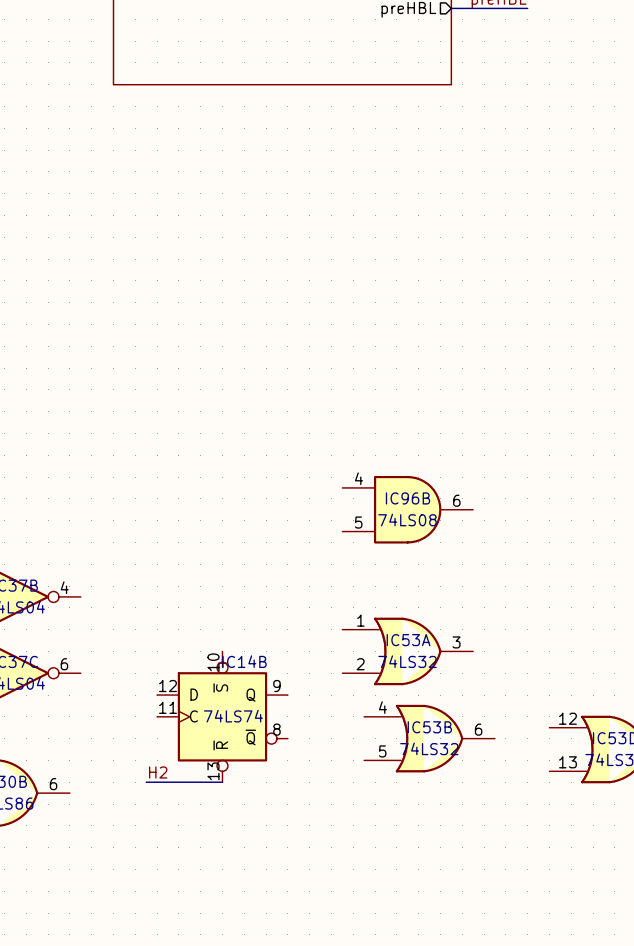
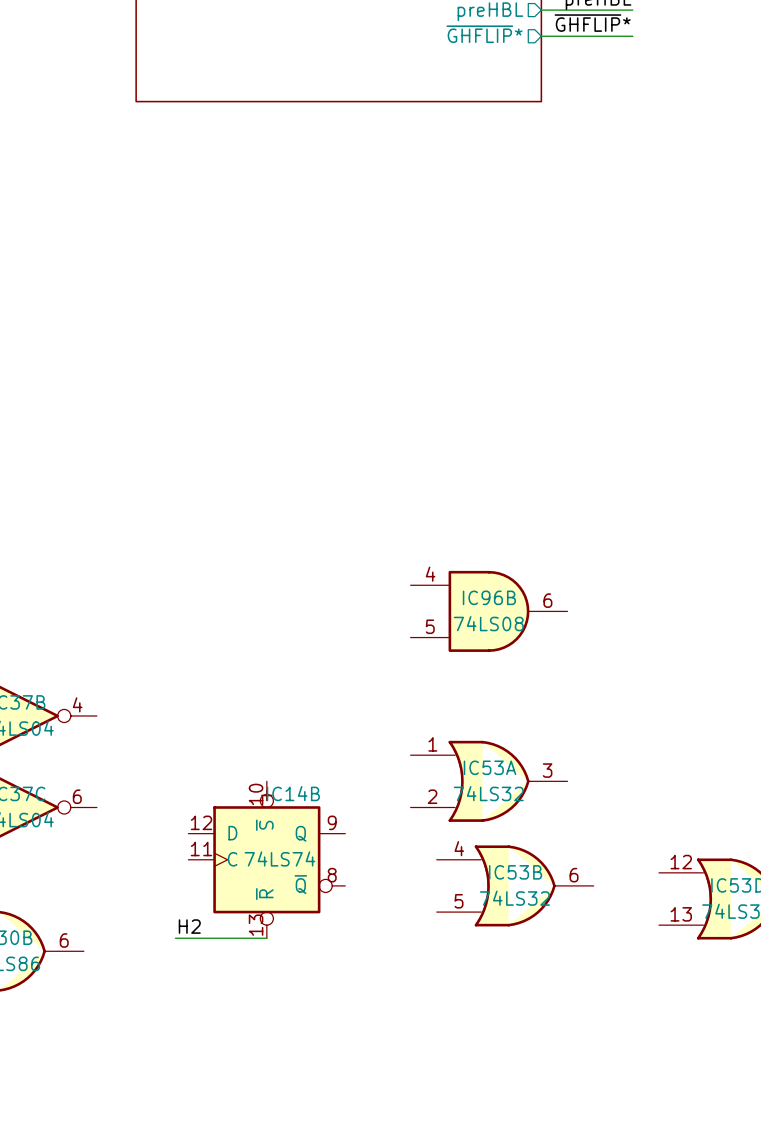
label: none -> ~{GHFLIP}* (592, 23)
sheet pin: none -> ~{GHFLIP}* (484, 34)
wire: none -> (541, 36) (632, 36)

